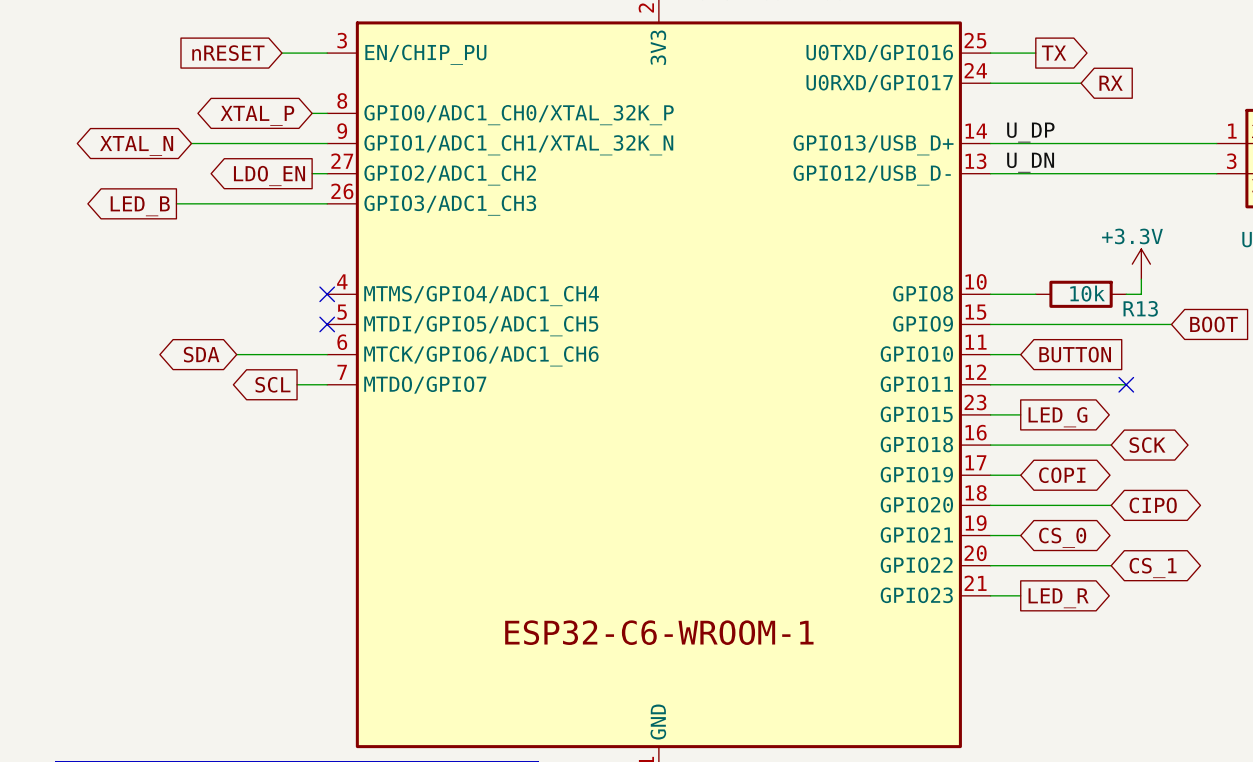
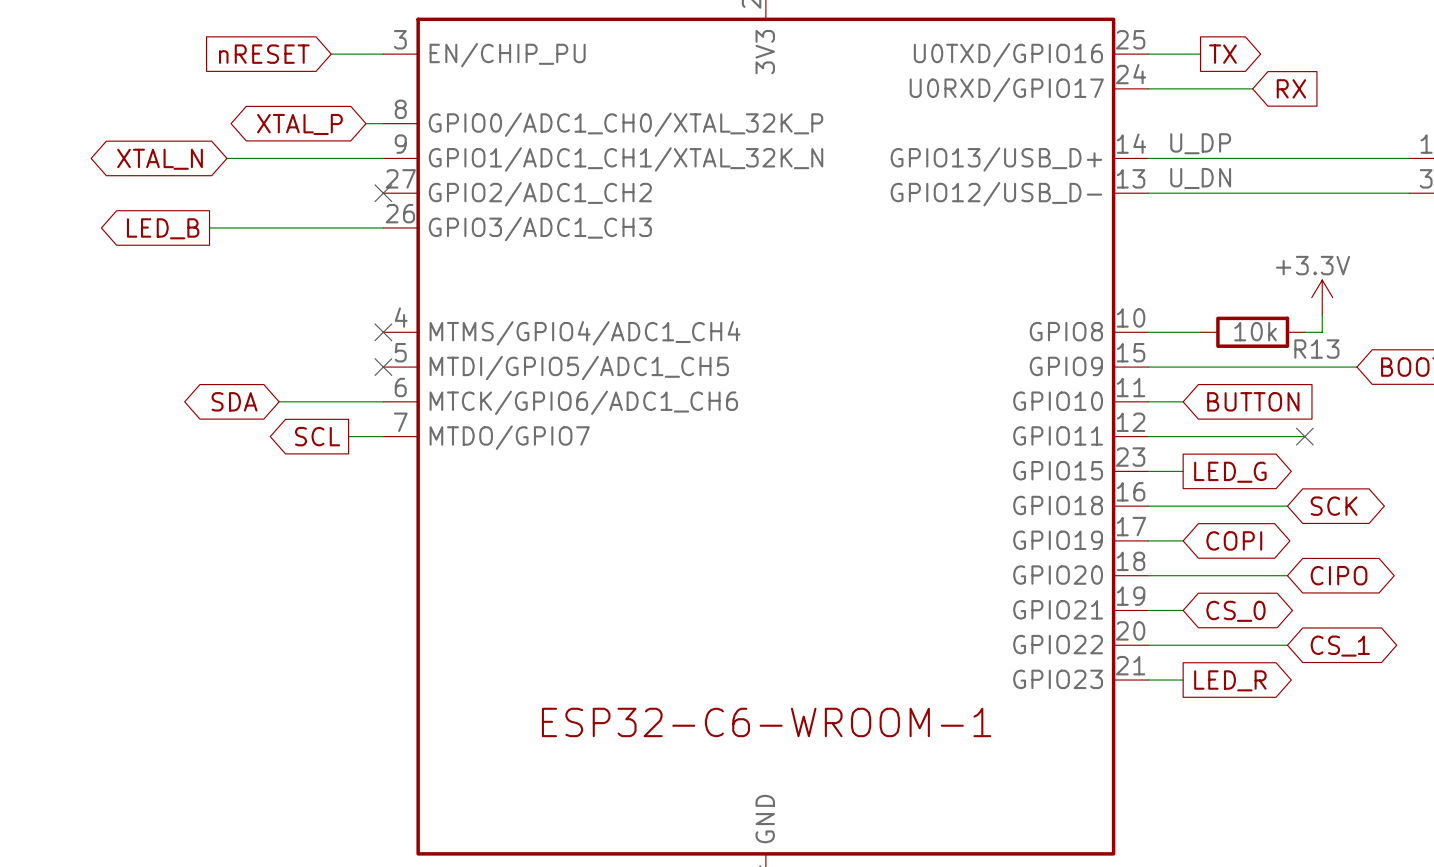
wire: (312, 173) (327, 173) -> none
no-connect mark: none -> (383, 193)
global label: LDO_EN (269, 175) -> none

